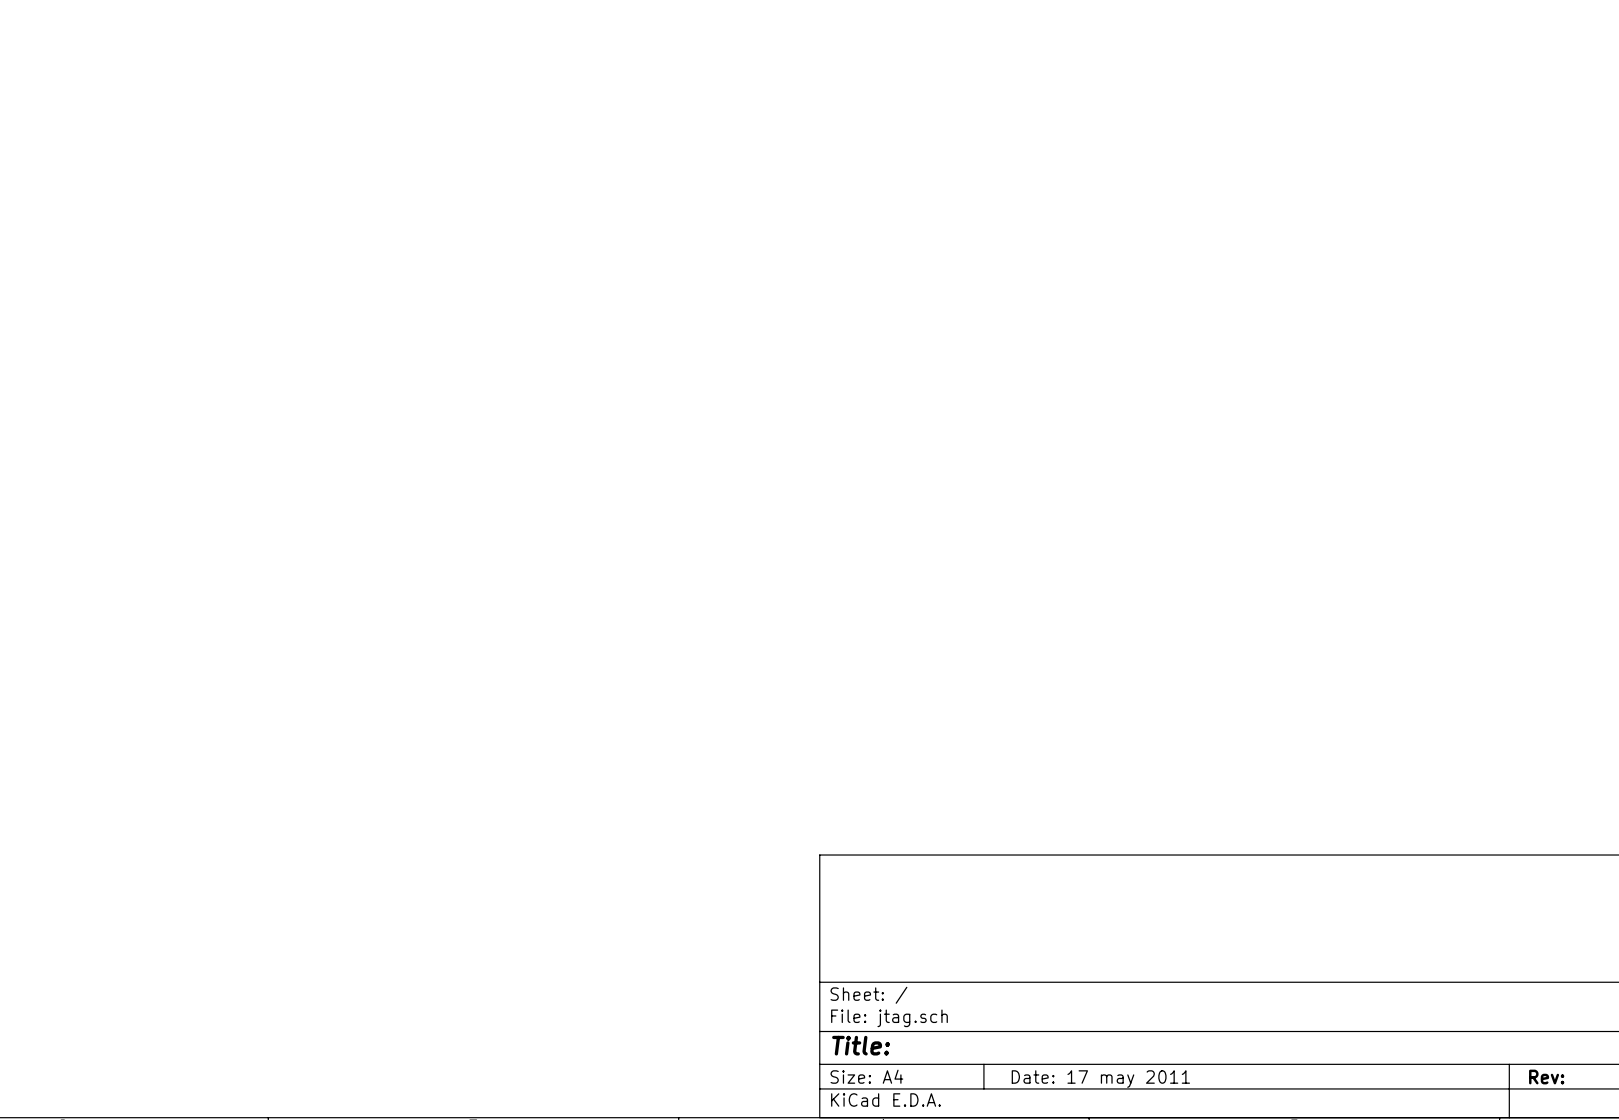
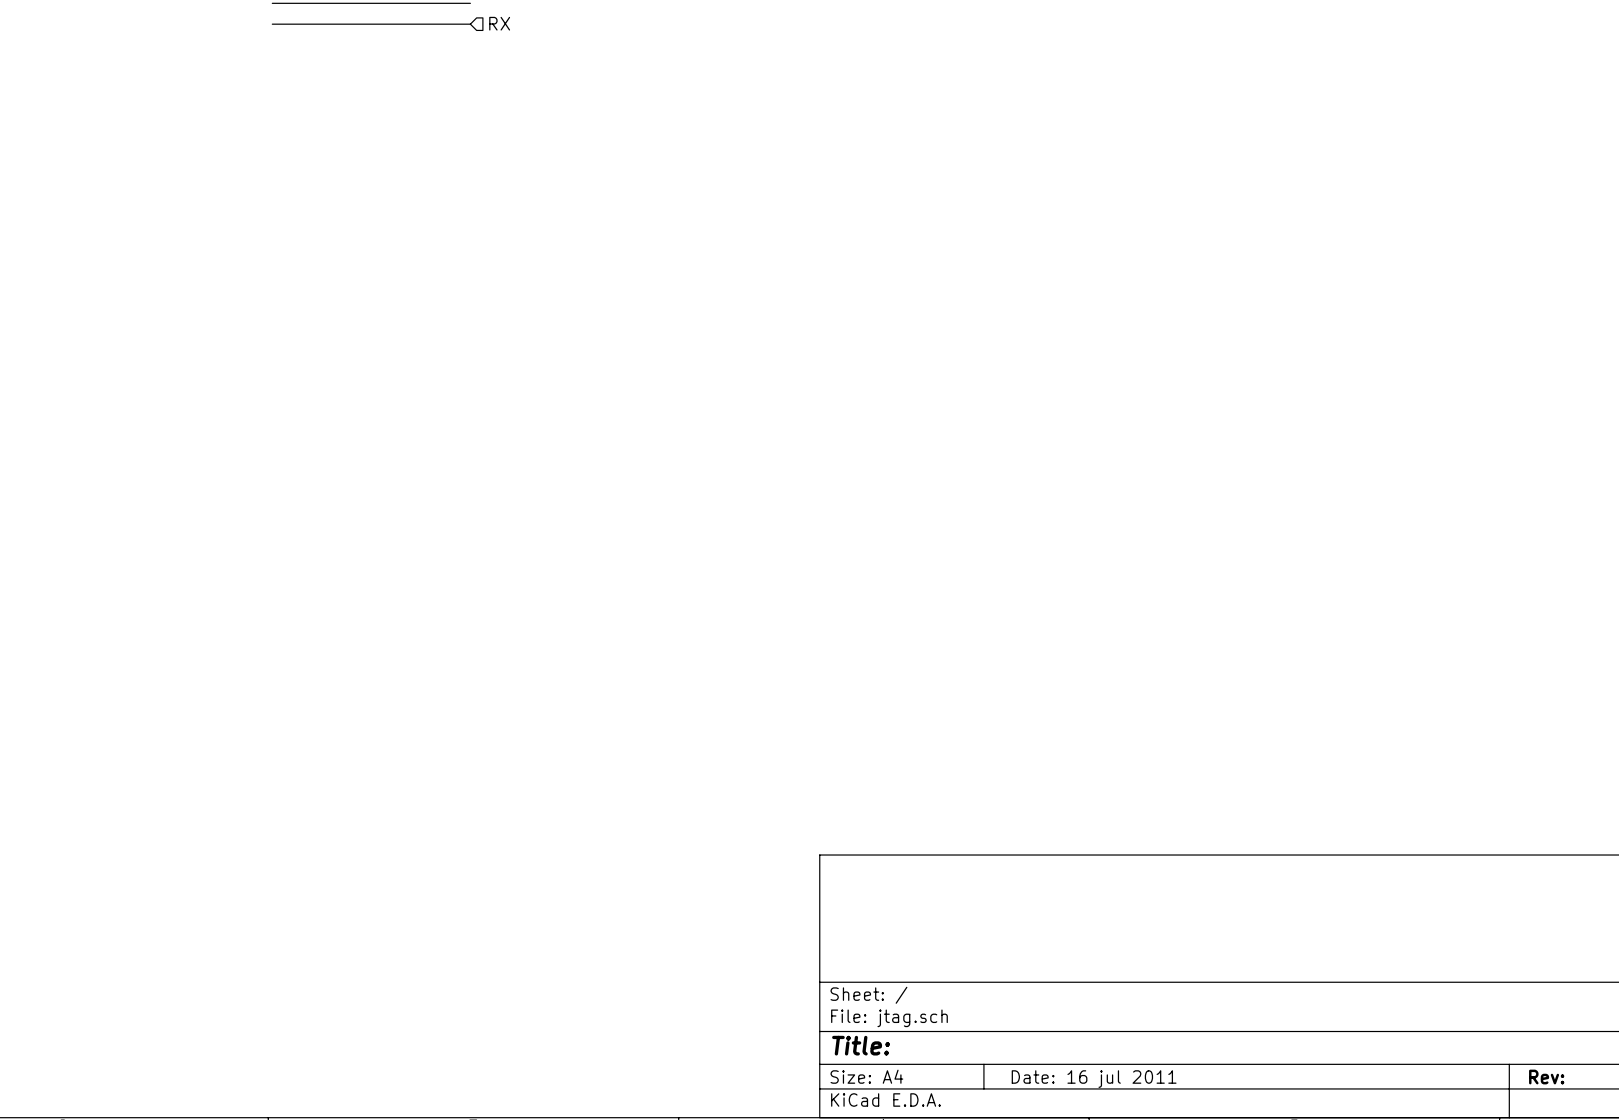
wire: none -> (272, 3) (470, 3)
hierarchical label: none -> RX (499, 23)
wire: none -> (272, 24) (470, 24)
title block: Date: 17 may 2011 (1100, 1079) -> Date: 16 jul 2011 (1094, 1079)

